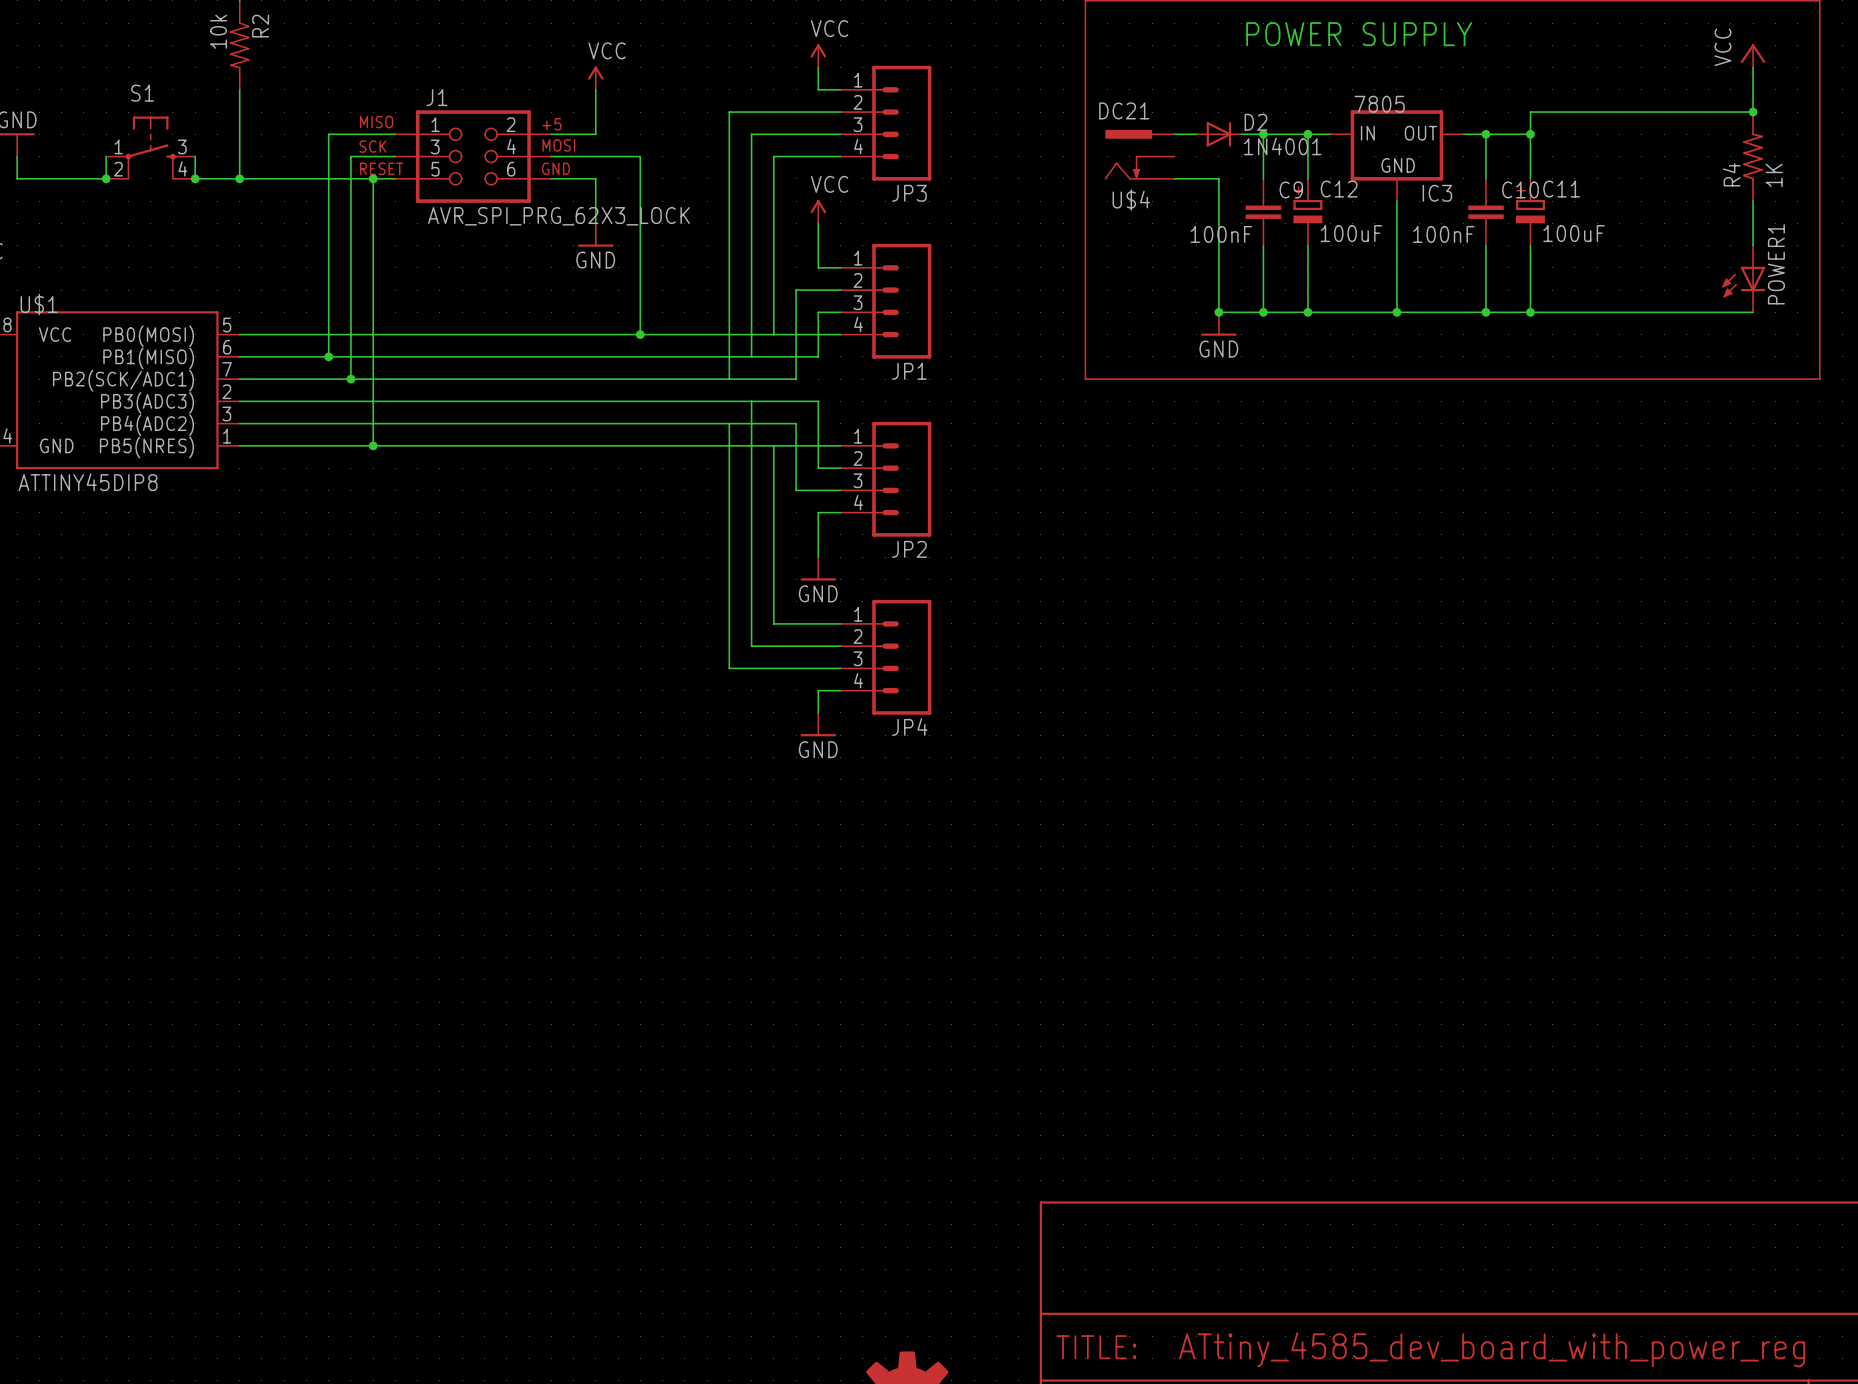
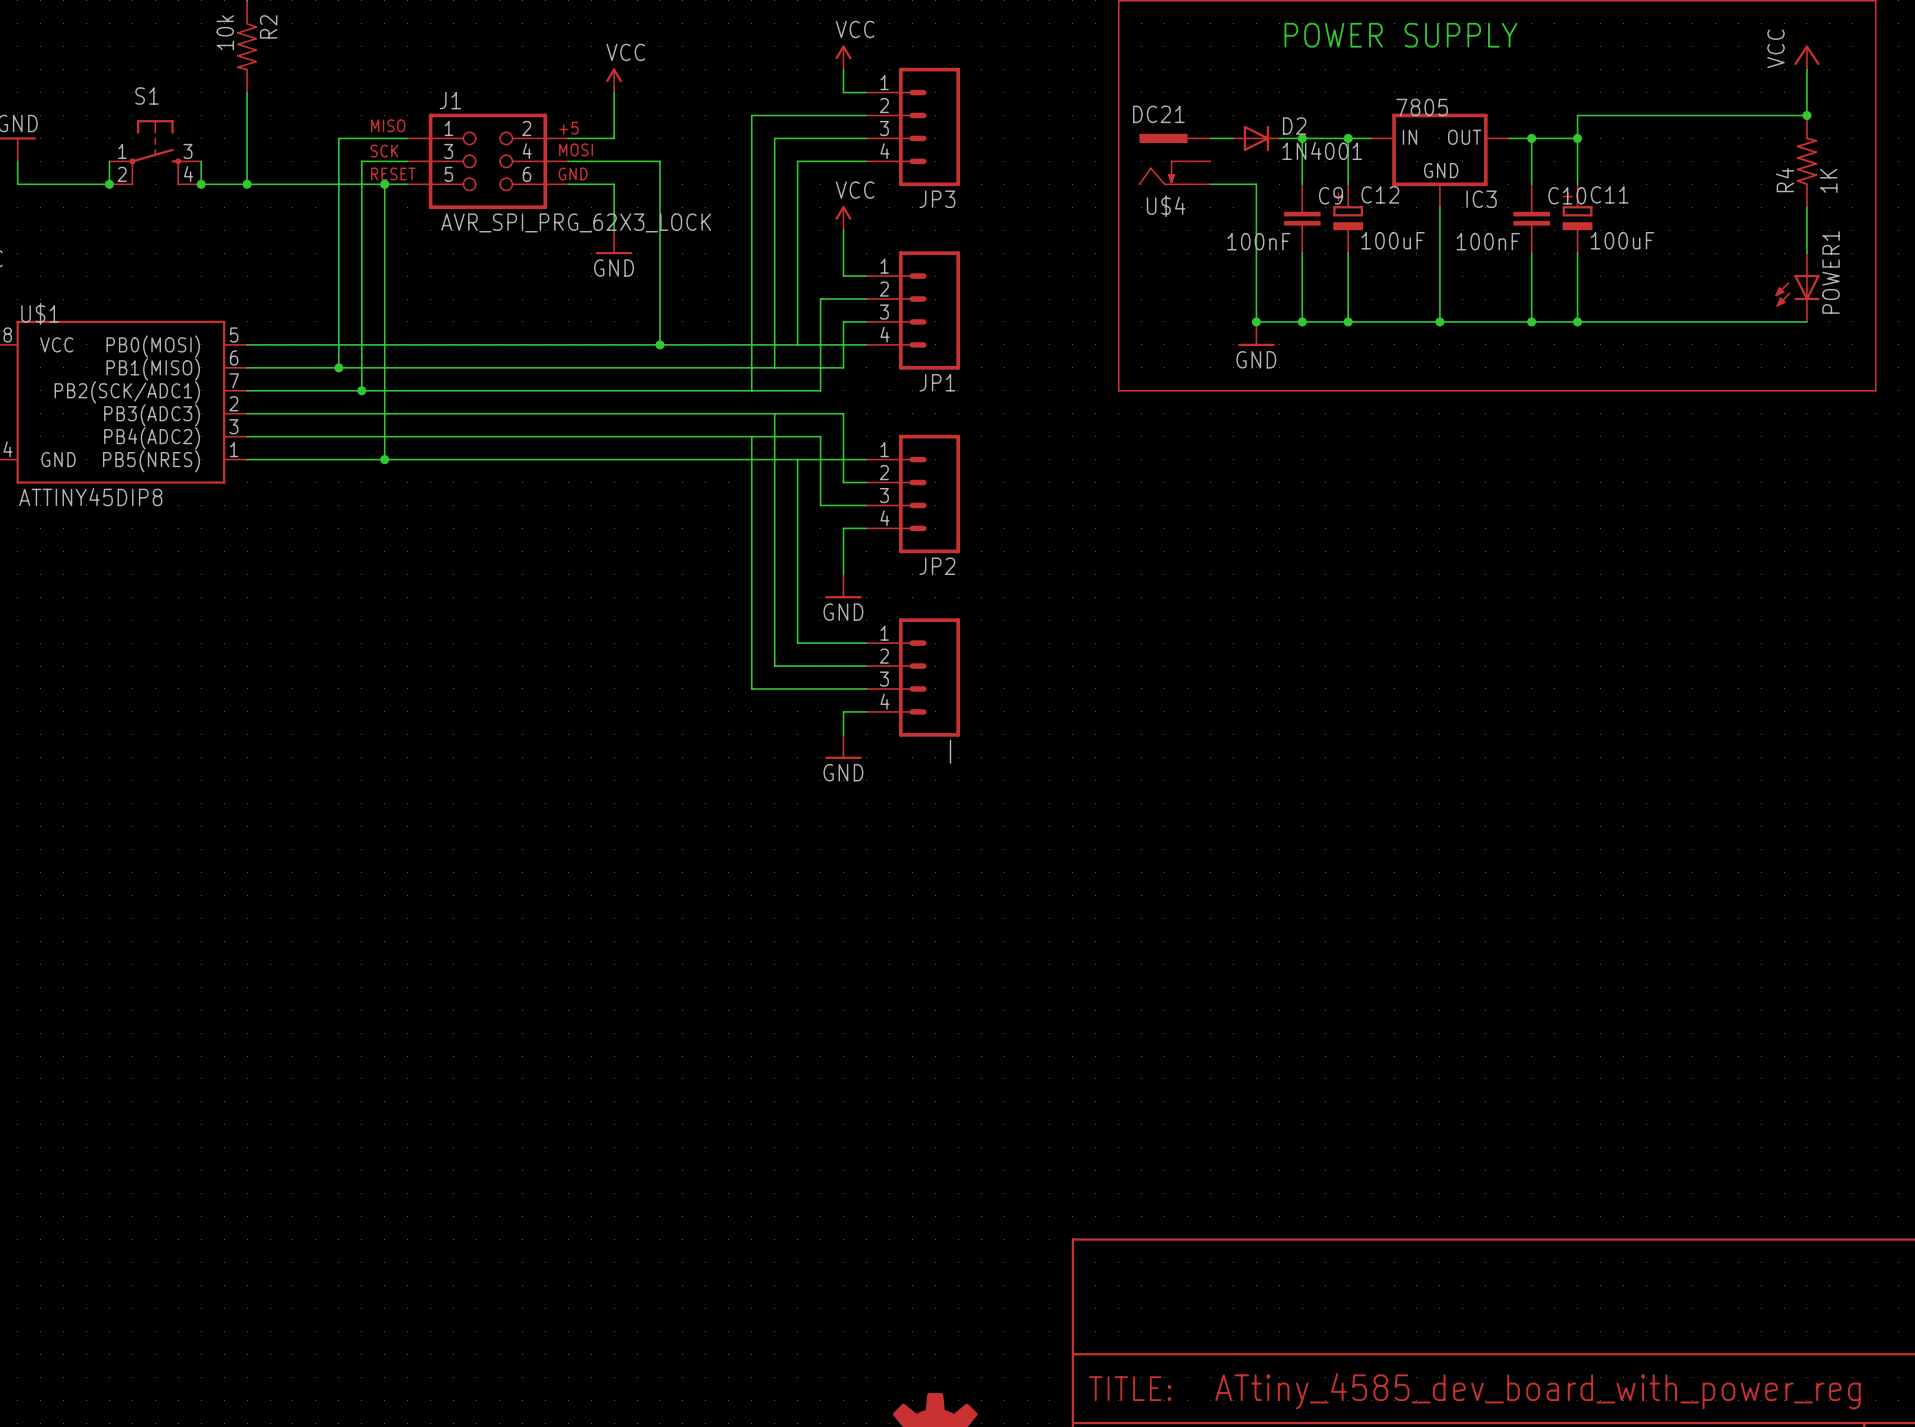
JP4 name: JP4 (909, 727) -> | (950, 751)

